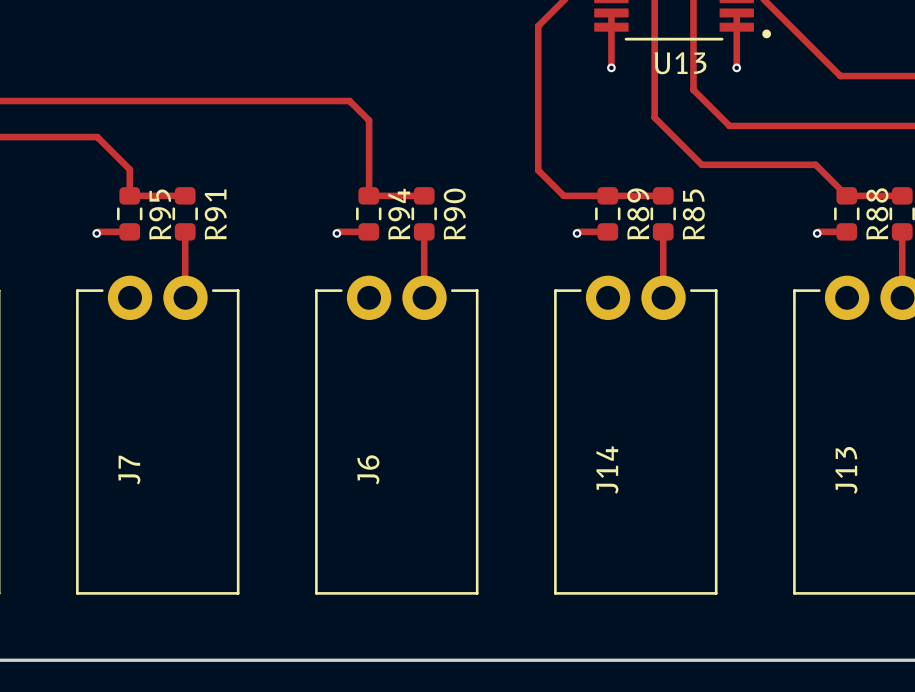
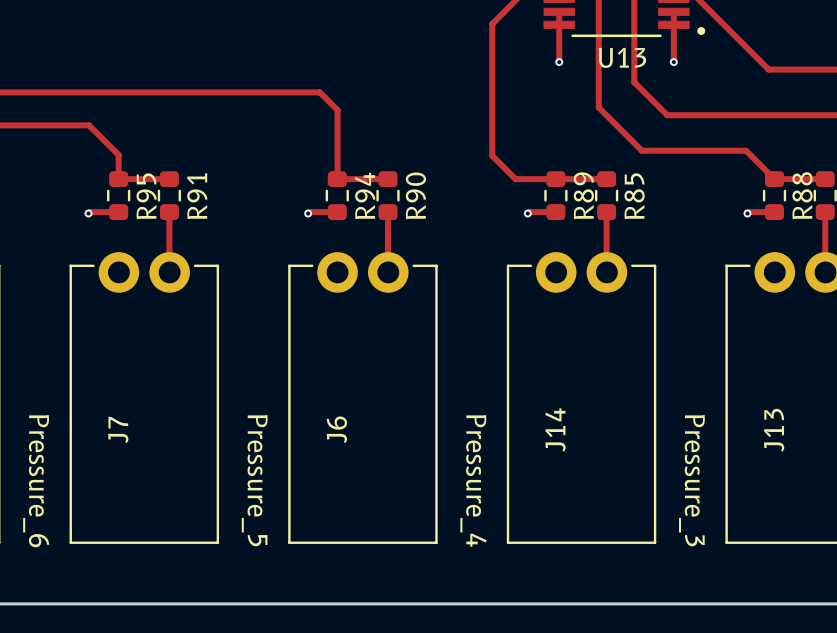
J7 value: none -> Pressure_6 (36, 481)
J6 value: none -> Pressure_5 (254, 480)
J14 value: none -> Pressure_4 (473, 480)
J13 value: none -> Pressure_3 (691, 480)

